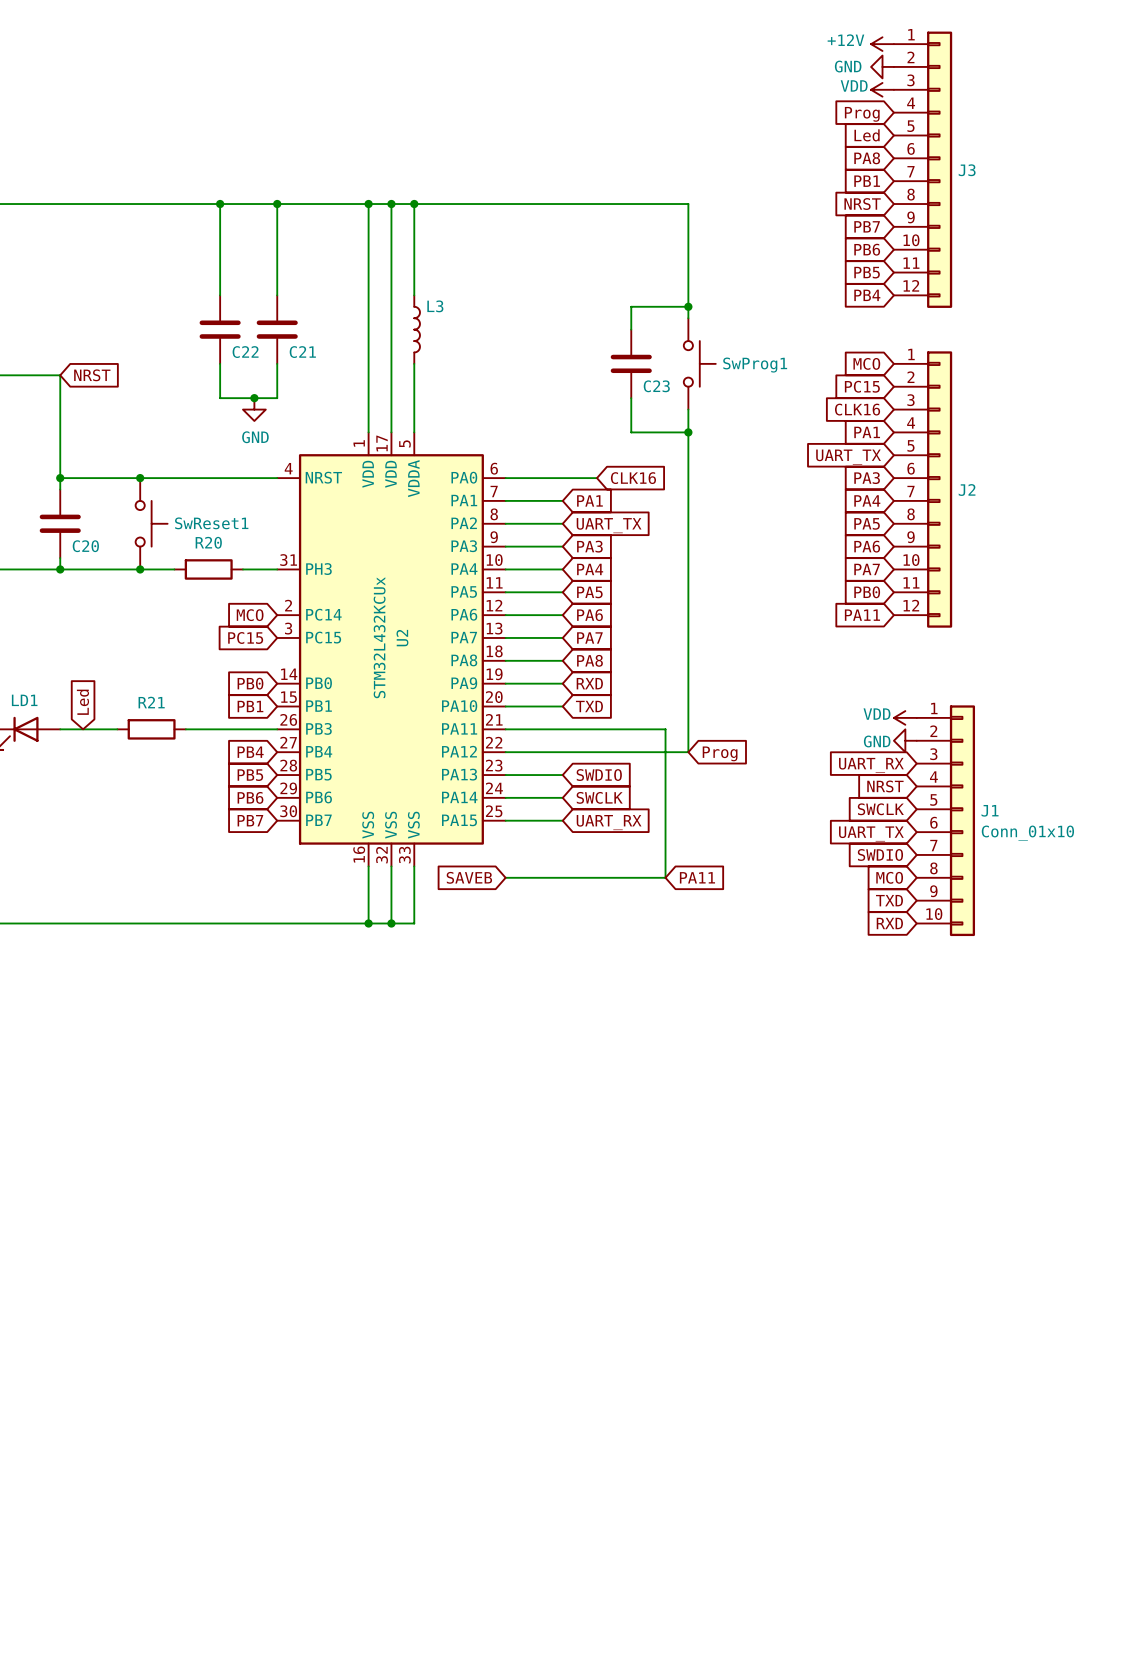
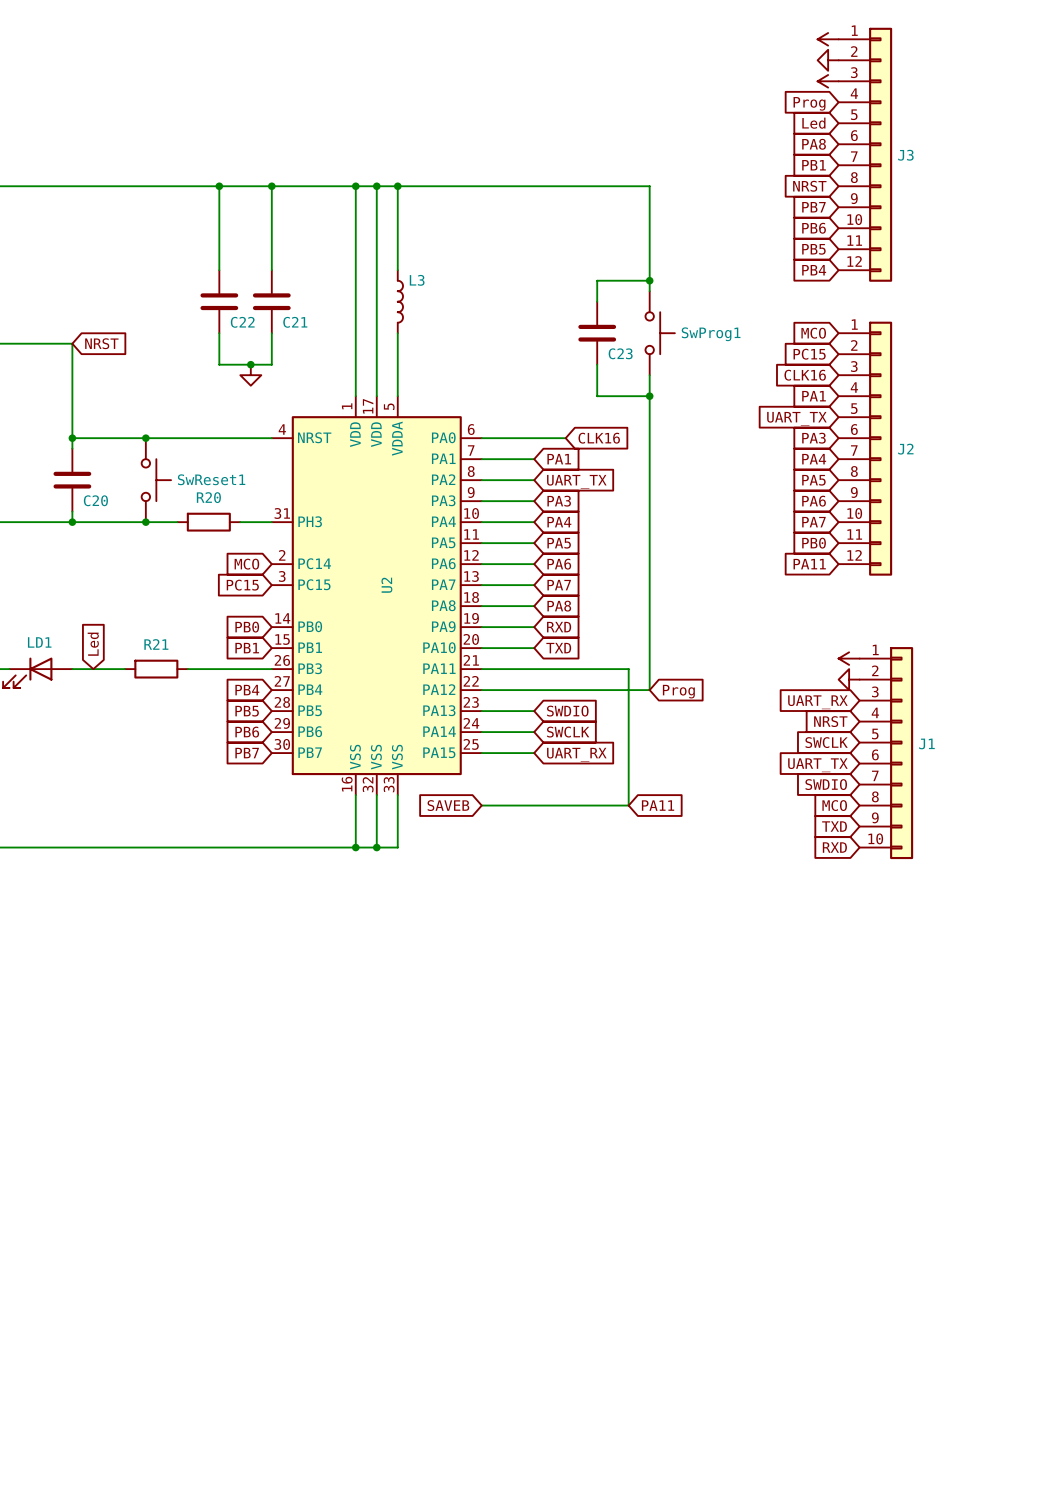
power symbol text: +12V (845, 40) -> none
power symbol text: GND (848, 66) -> none
power symbol text: VDD (854, 85) -> none
power symbol text: GND (255, 437) -> none
U2 value: STM32L432KCUx (379, 637) -> none
power symbol text: VDD (876, 714) -> none
power symbol text: GND (877, 741) -> none
J1 value: Conn_01x10 (1027, 833) -> none

